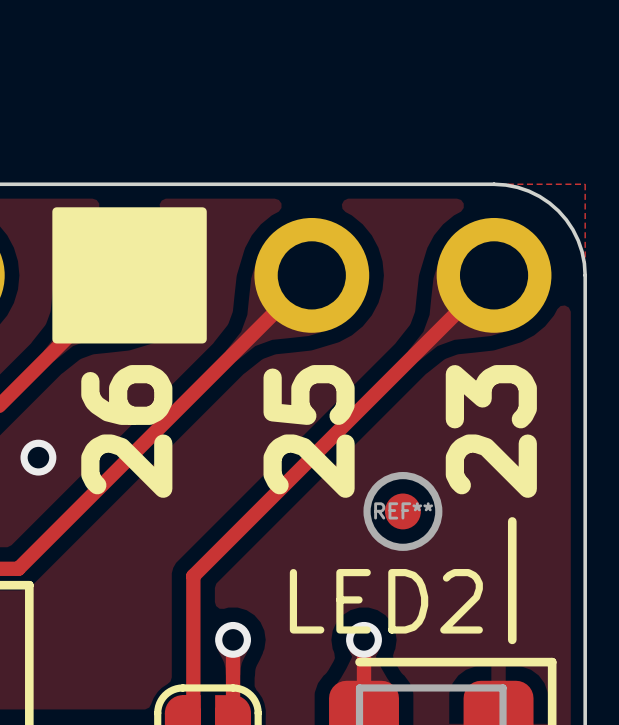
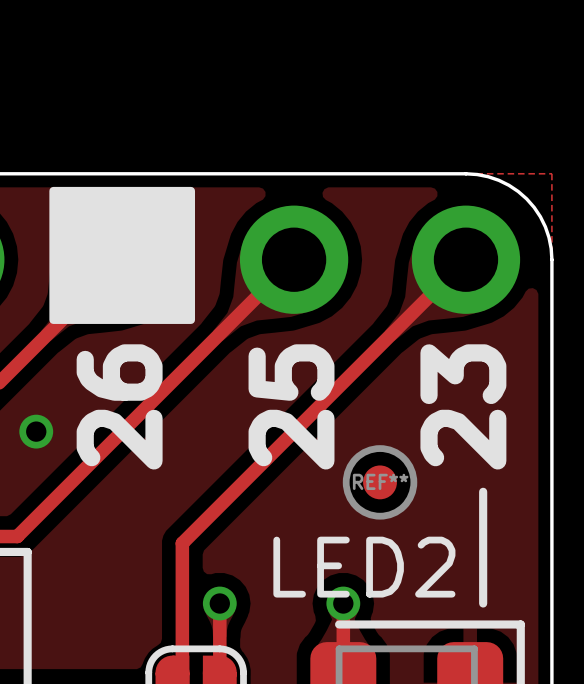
drawing shape: [52, 207, 207, 344] -> [49, 186, 196, 324]

